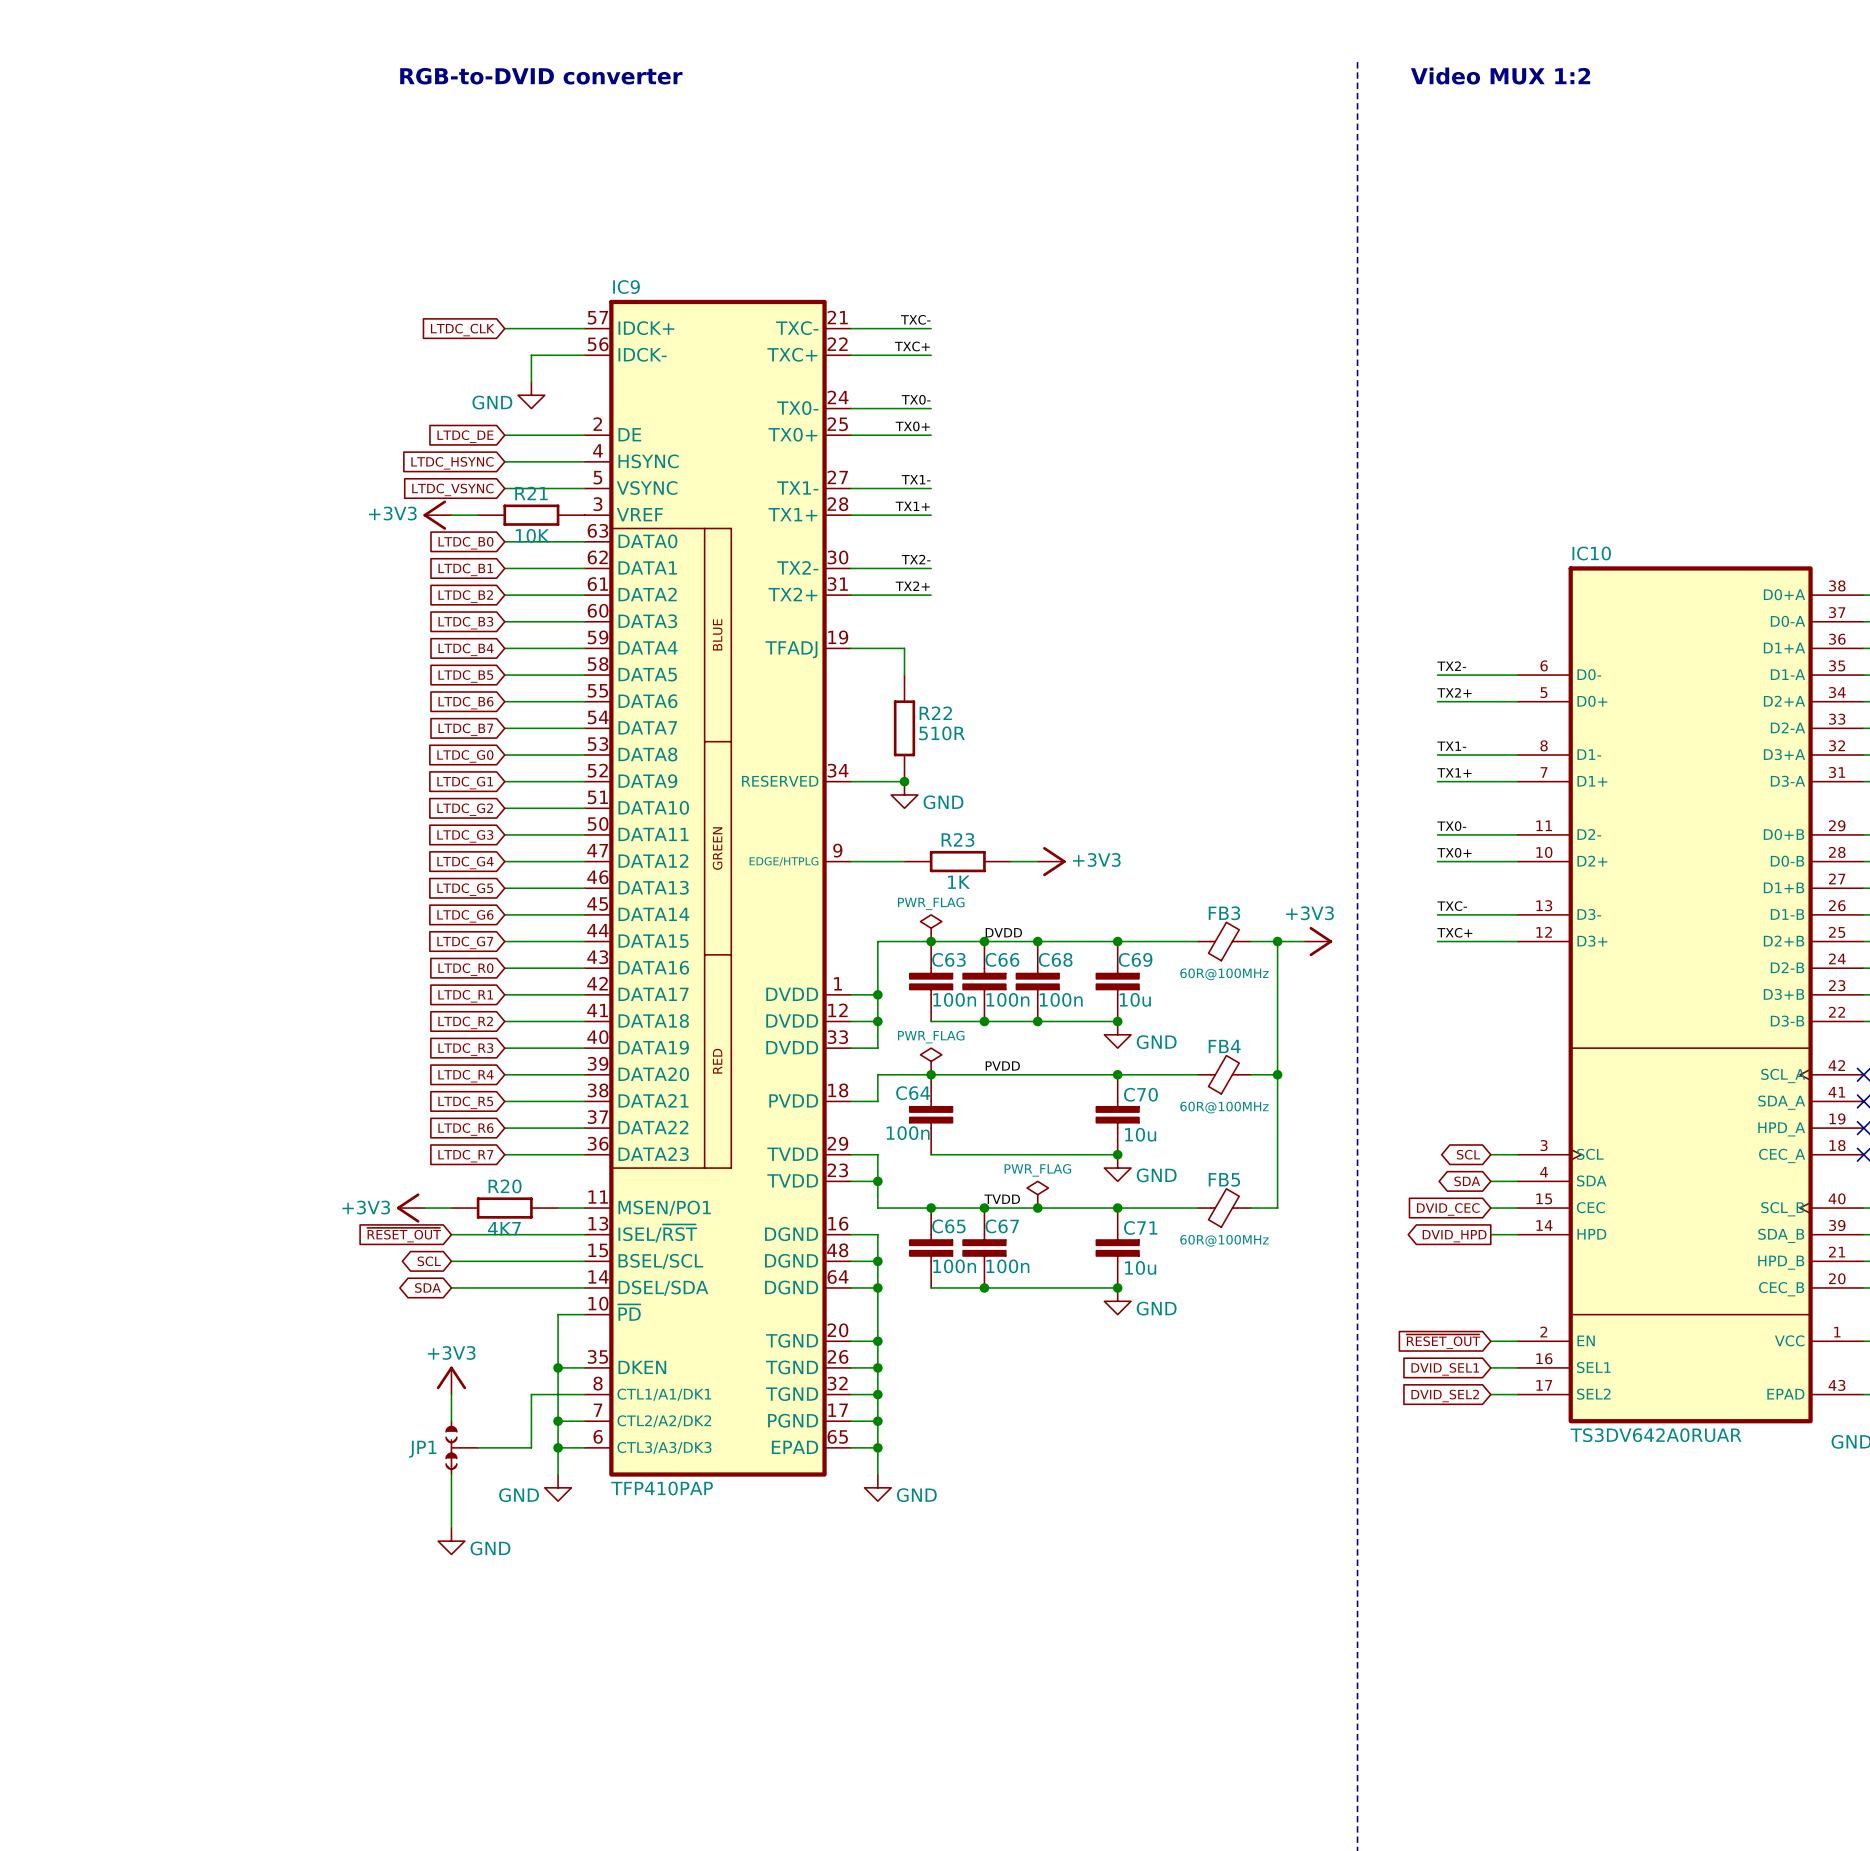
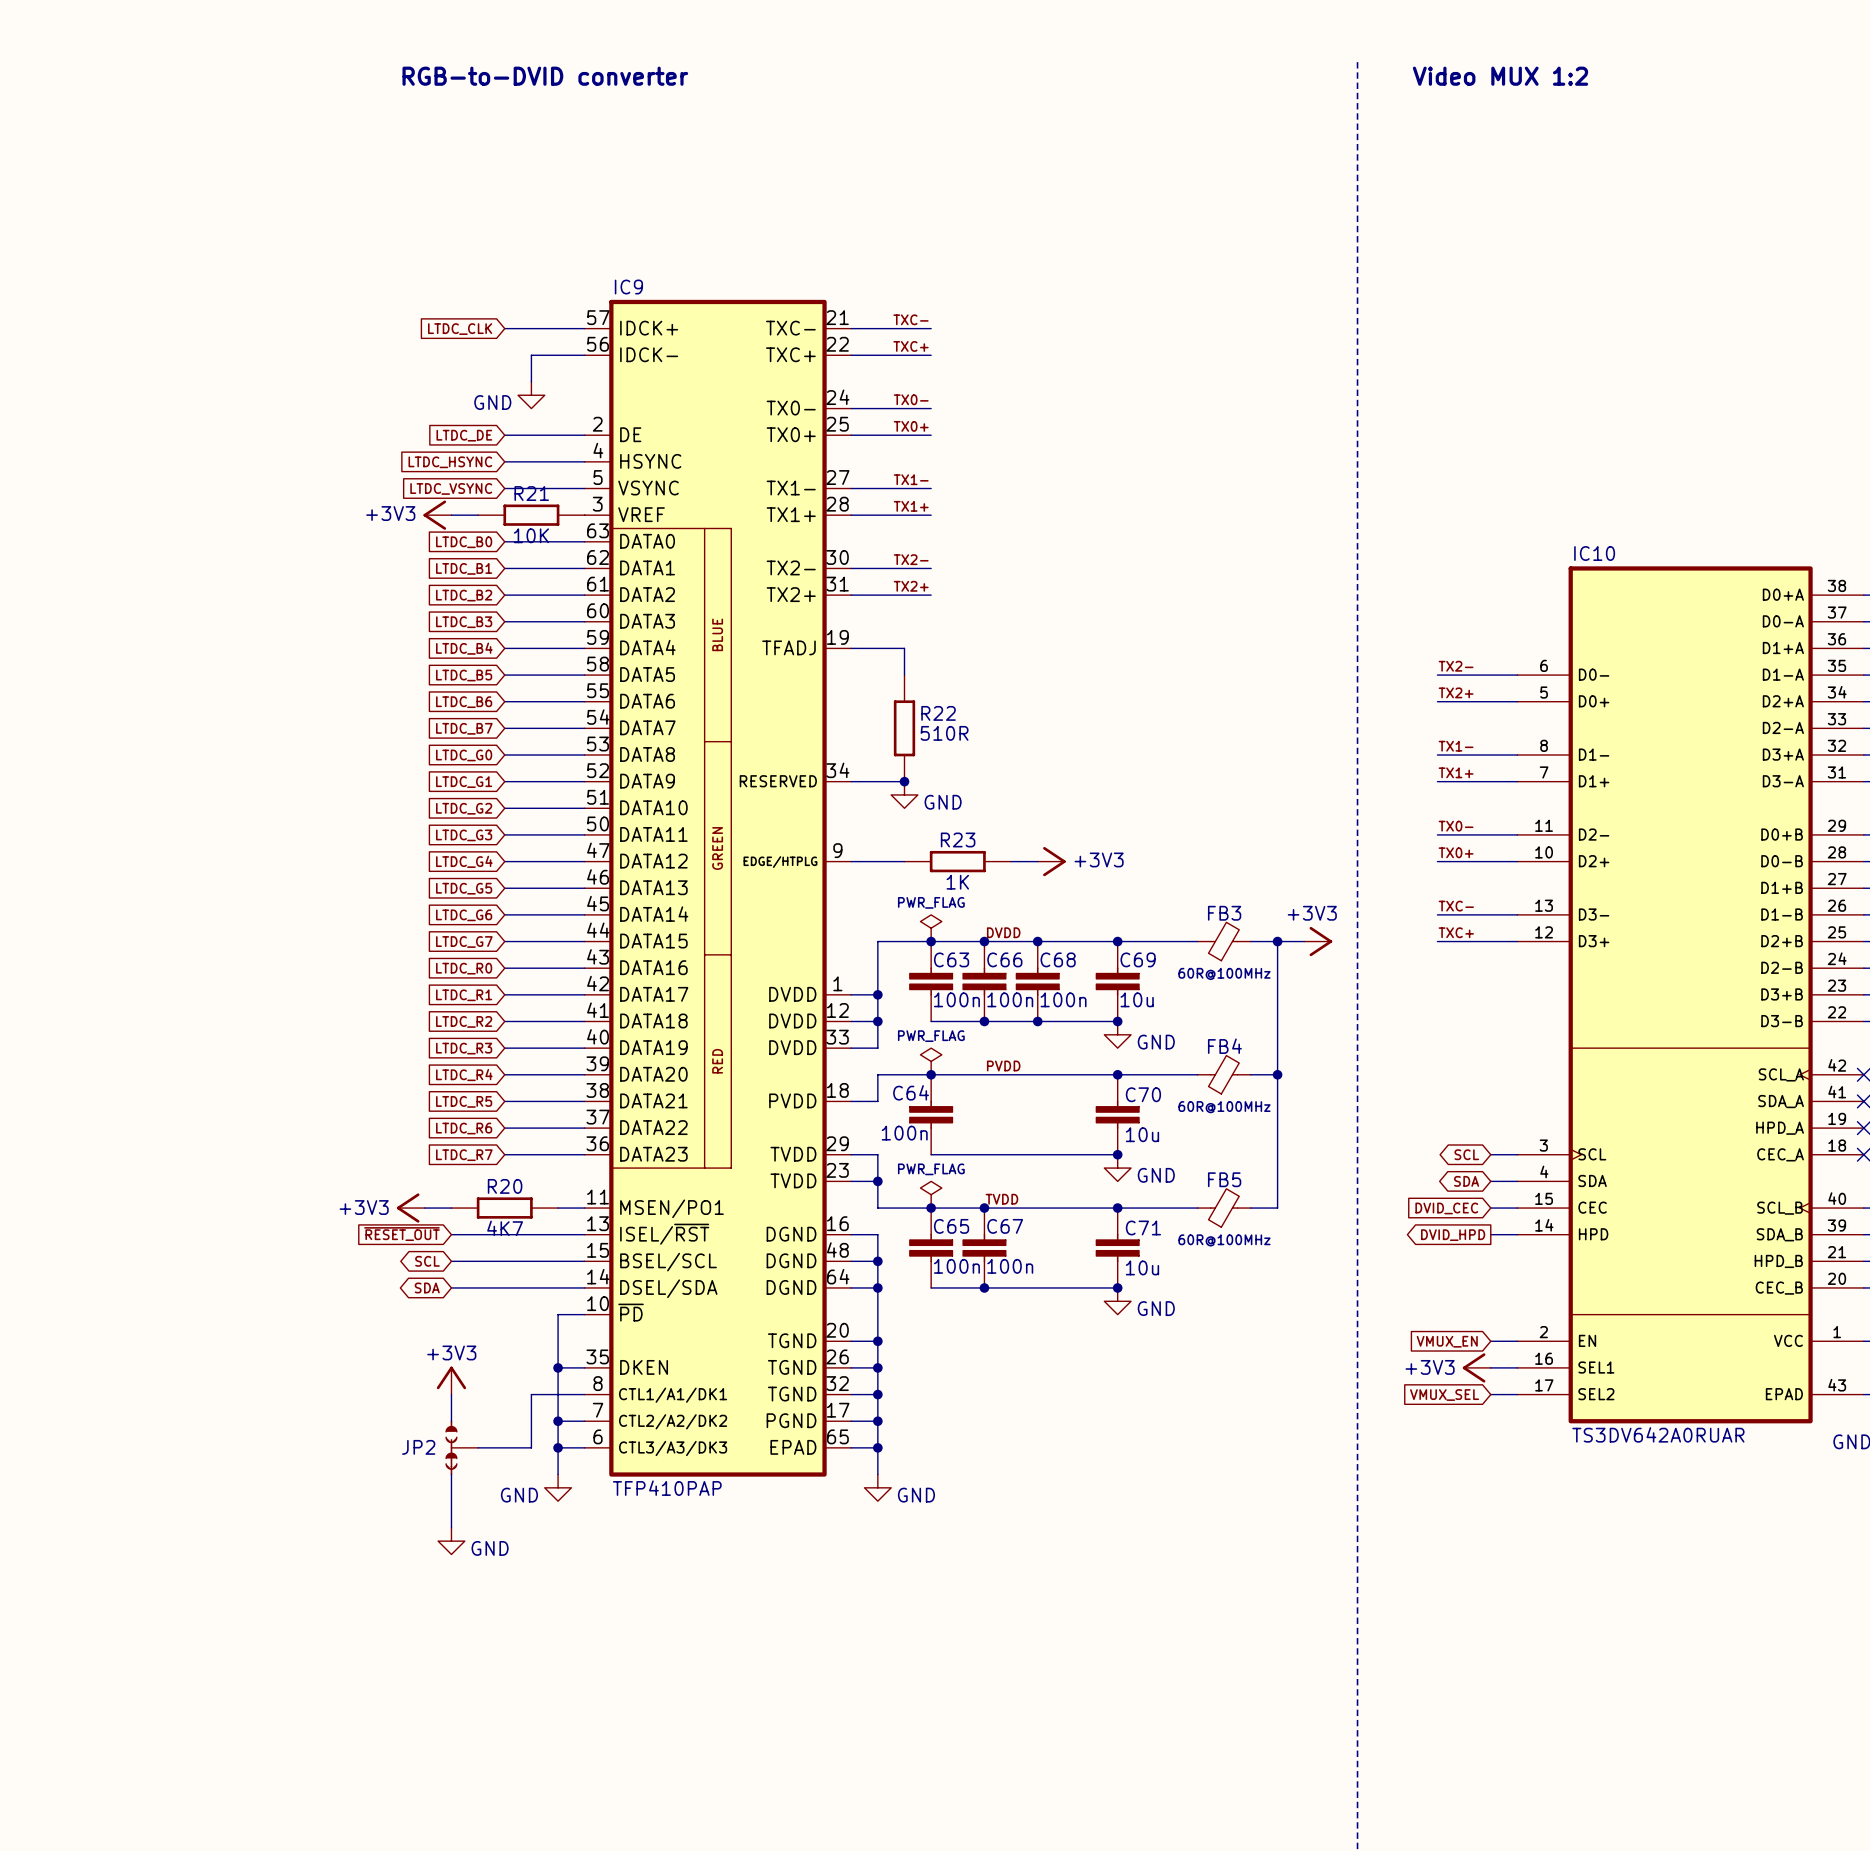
power symbol position: PWR_FLAG (1037, 1194) -> PWR_FLAG (931, 1194)
junction: (1037, 1208) -> none
global label: ~{RESET_OUT} (1443, 1341) -> VMUX_EN (1447, 1341)
power symbol: none -> +3V3 (1476, 1367)
global label: DVID_SEL1 (1445, 1369) -> none
global label: DVID_SEL2 (1445, 1396) -> VMUX_SEL (1444, 1395)
JP1 name: JP1 (422, 1449) -> JP2 (418, 1447)

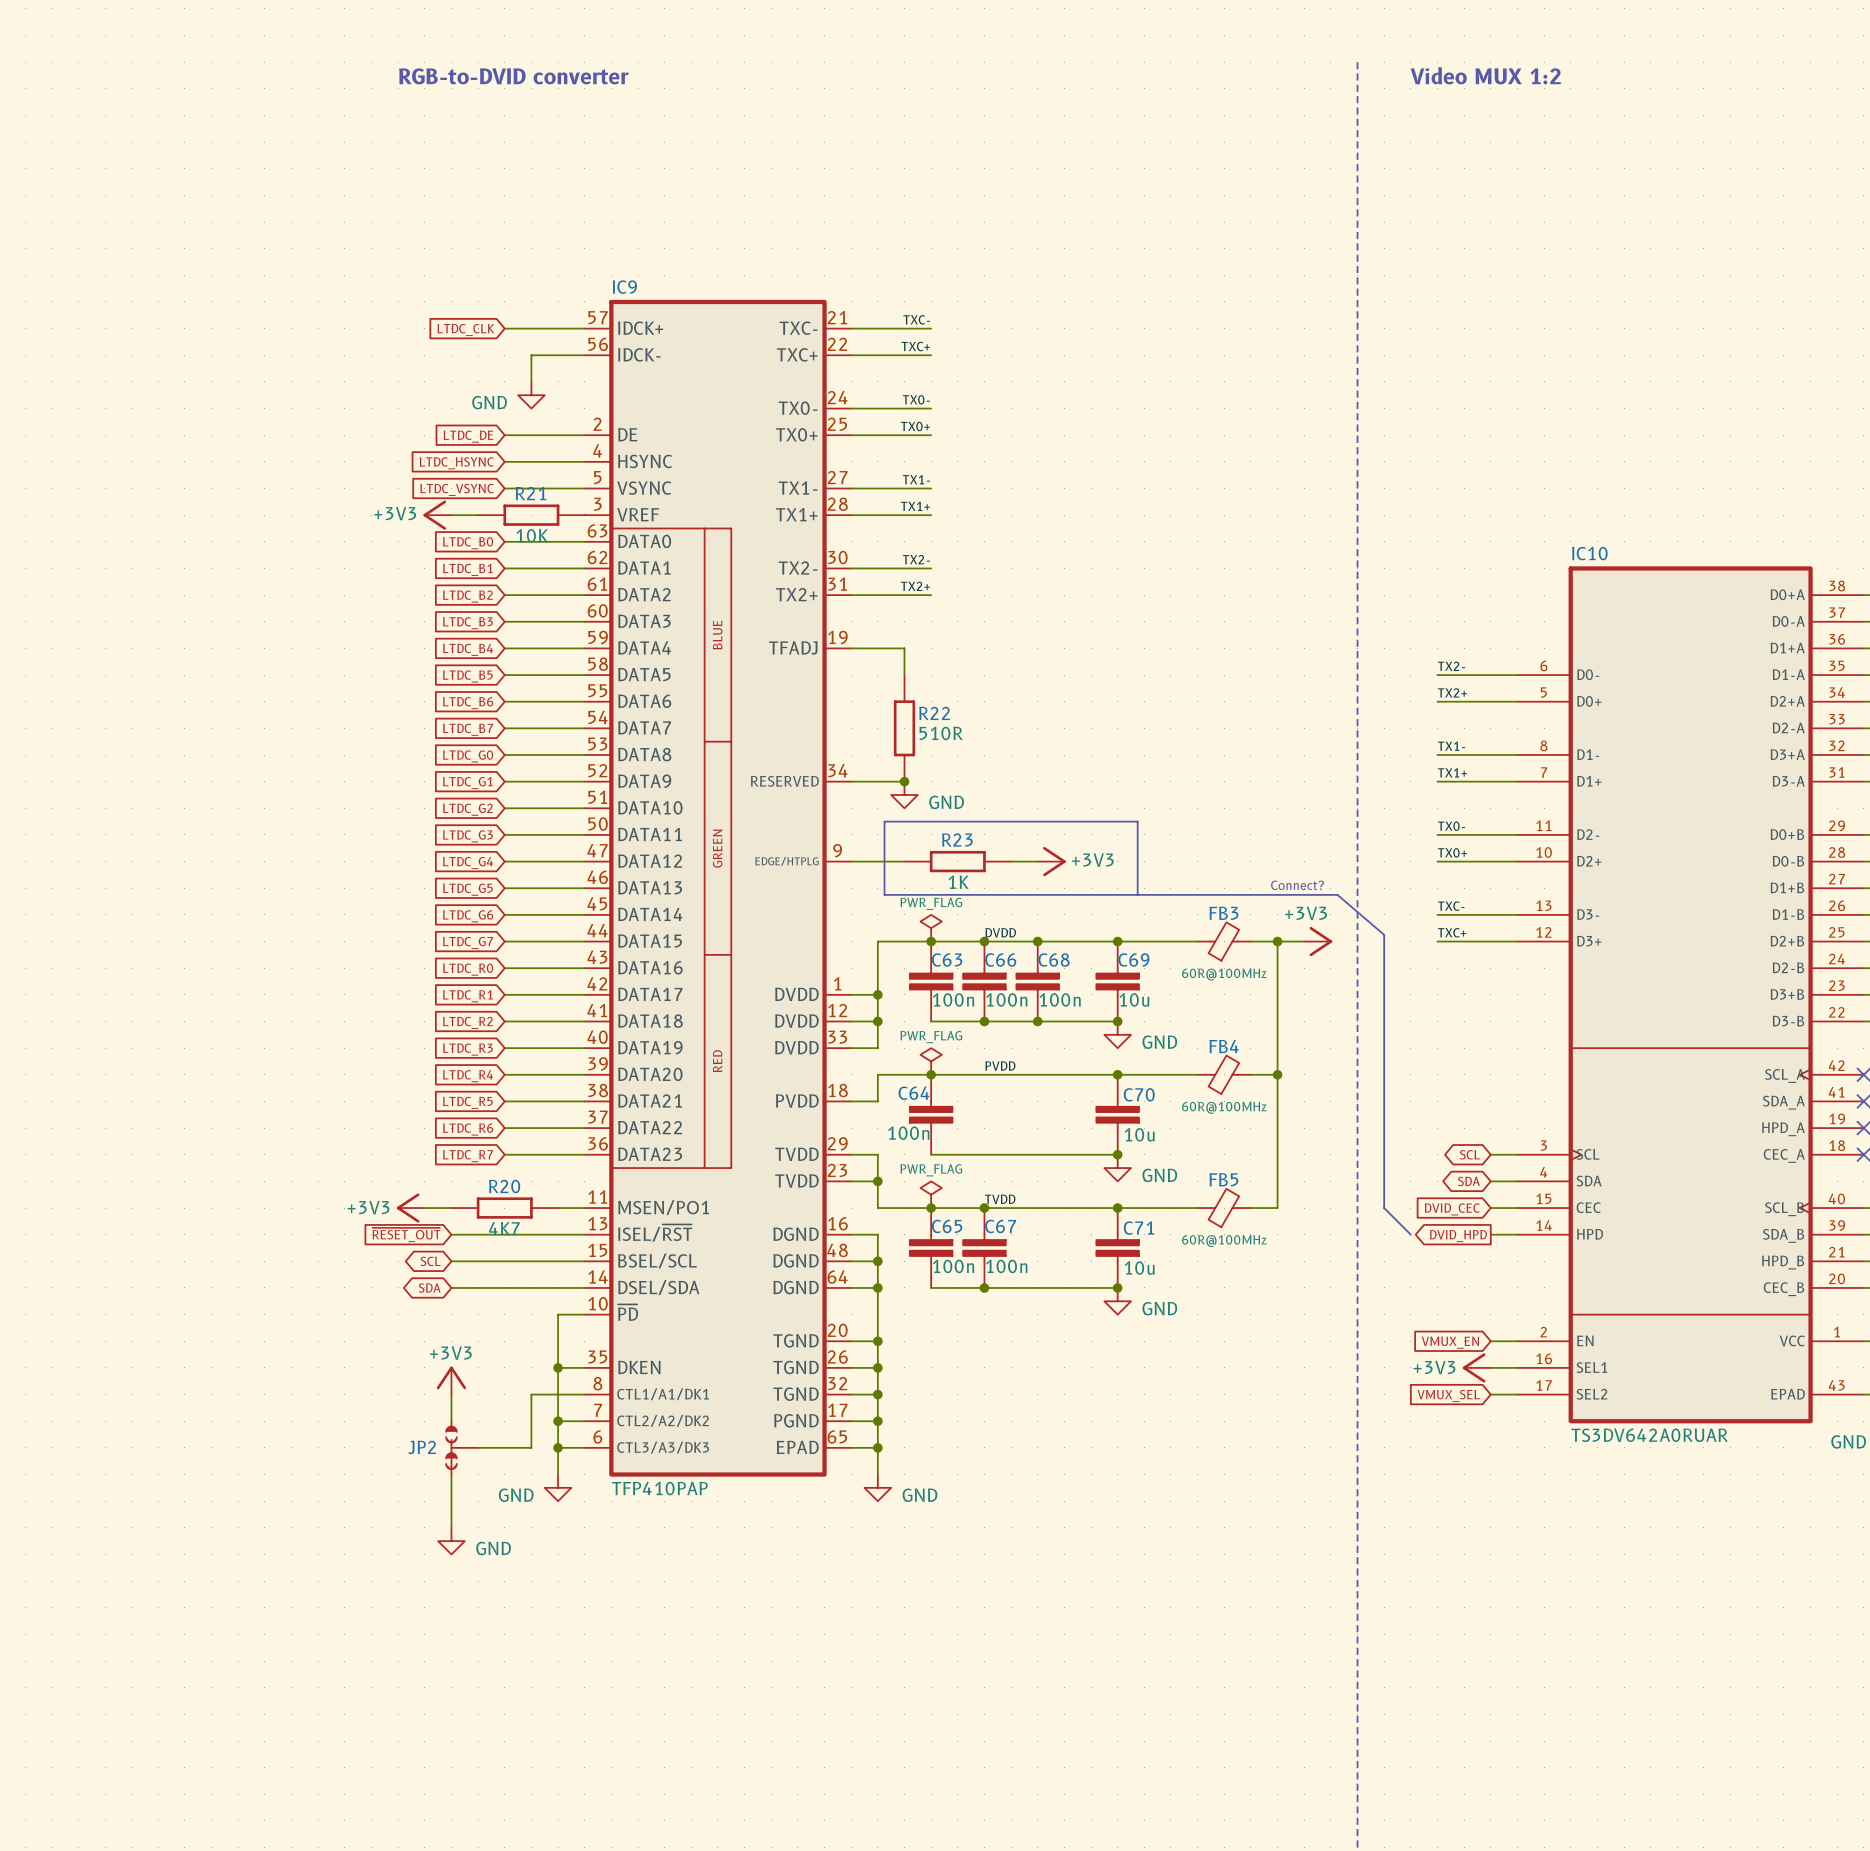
text: none -> Connect? (1297, 885)
line: none -> (1137, 894) (1137, 821) (884, 821) (884, 894) (1337, 894) (1384, 934) (1384, 1208) (1410, 1234)

